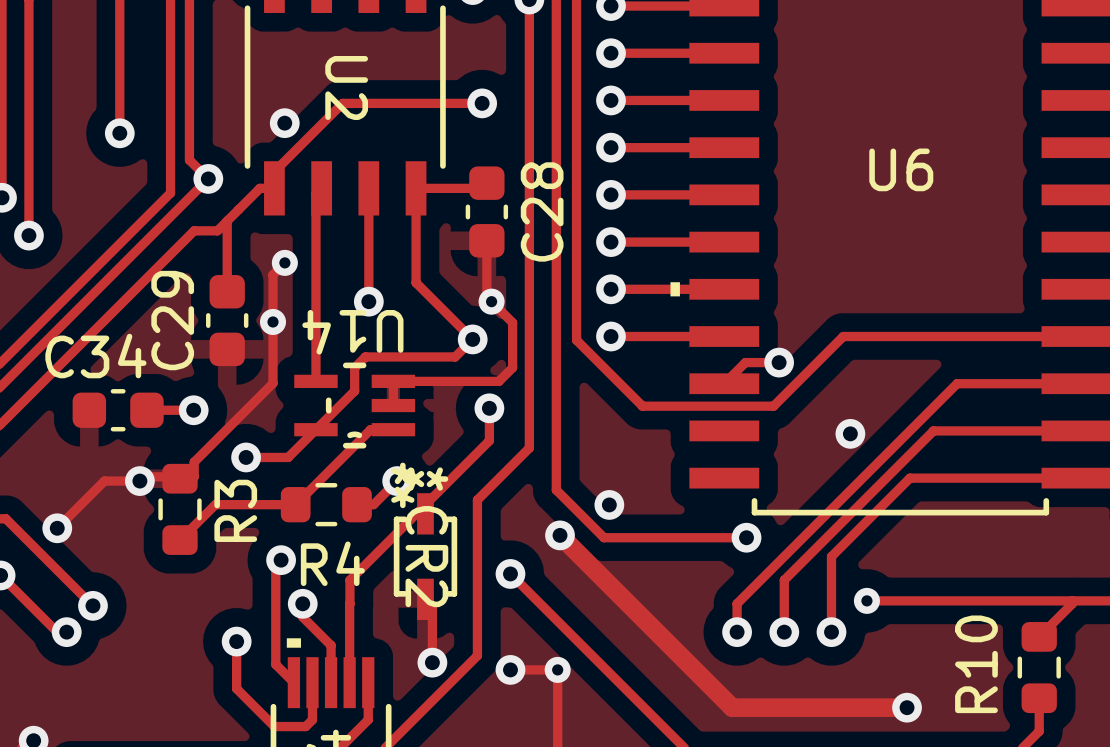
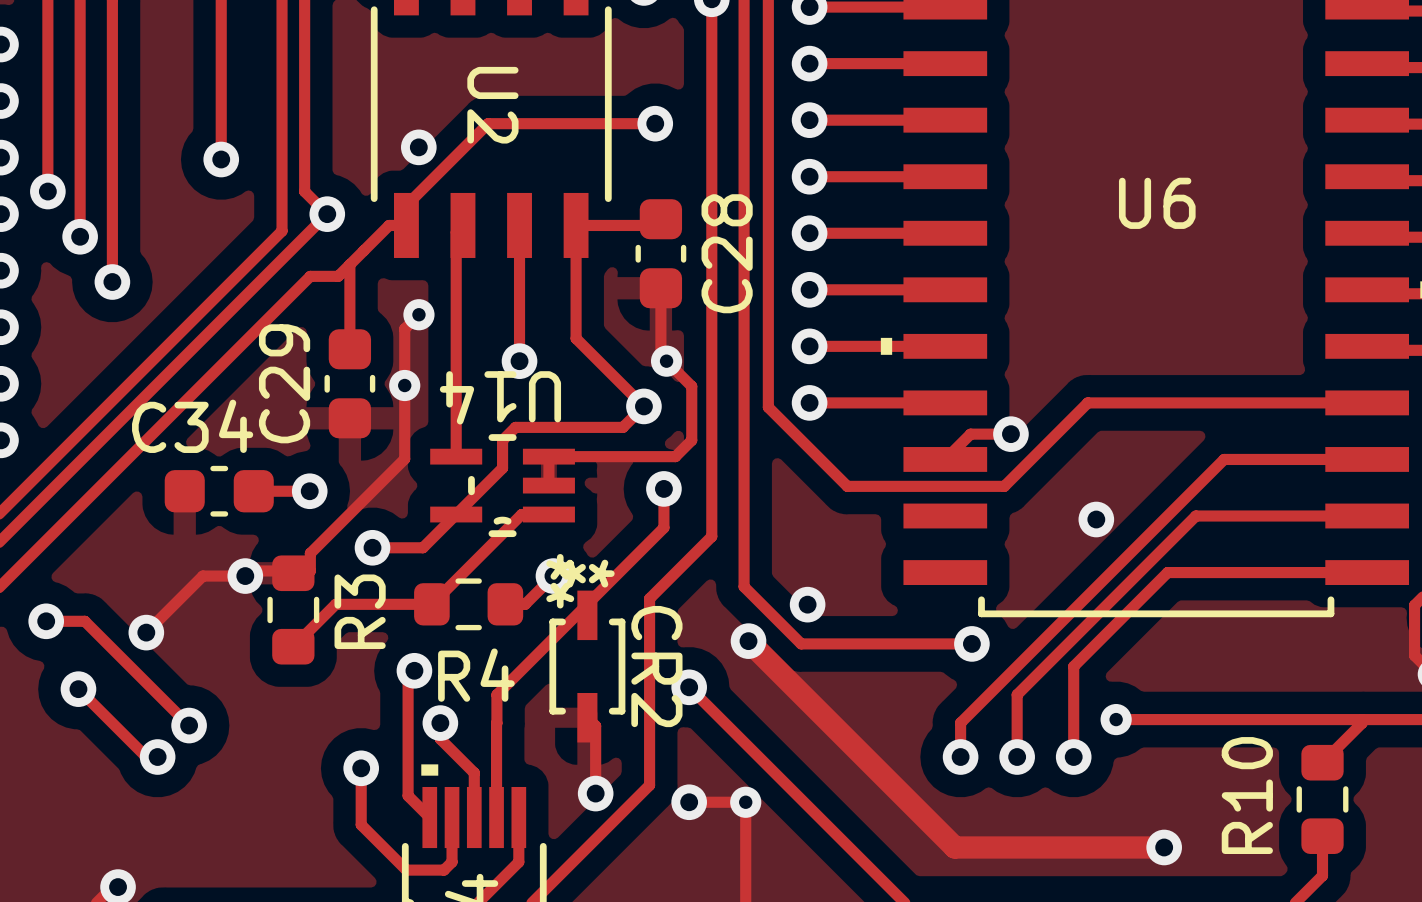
CR2 name position: CR2 (426, 556) -> CR2 (656, 666)

